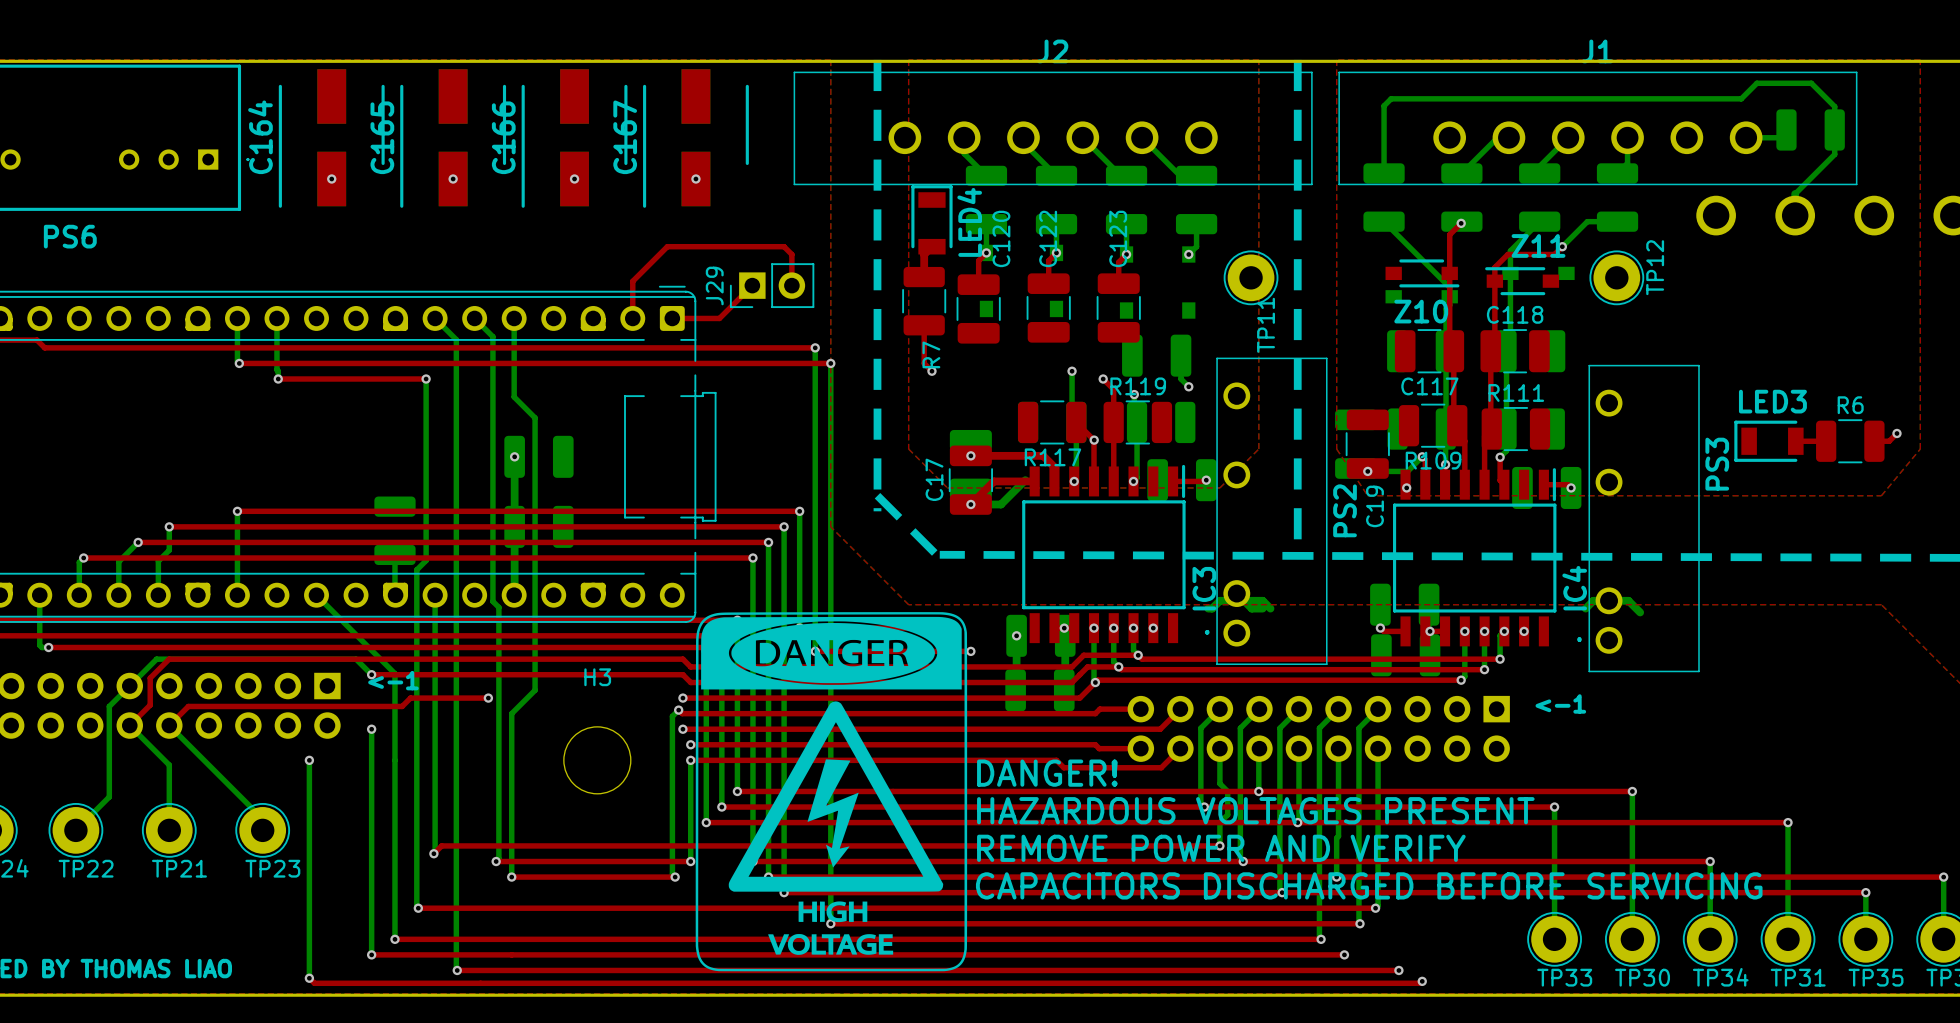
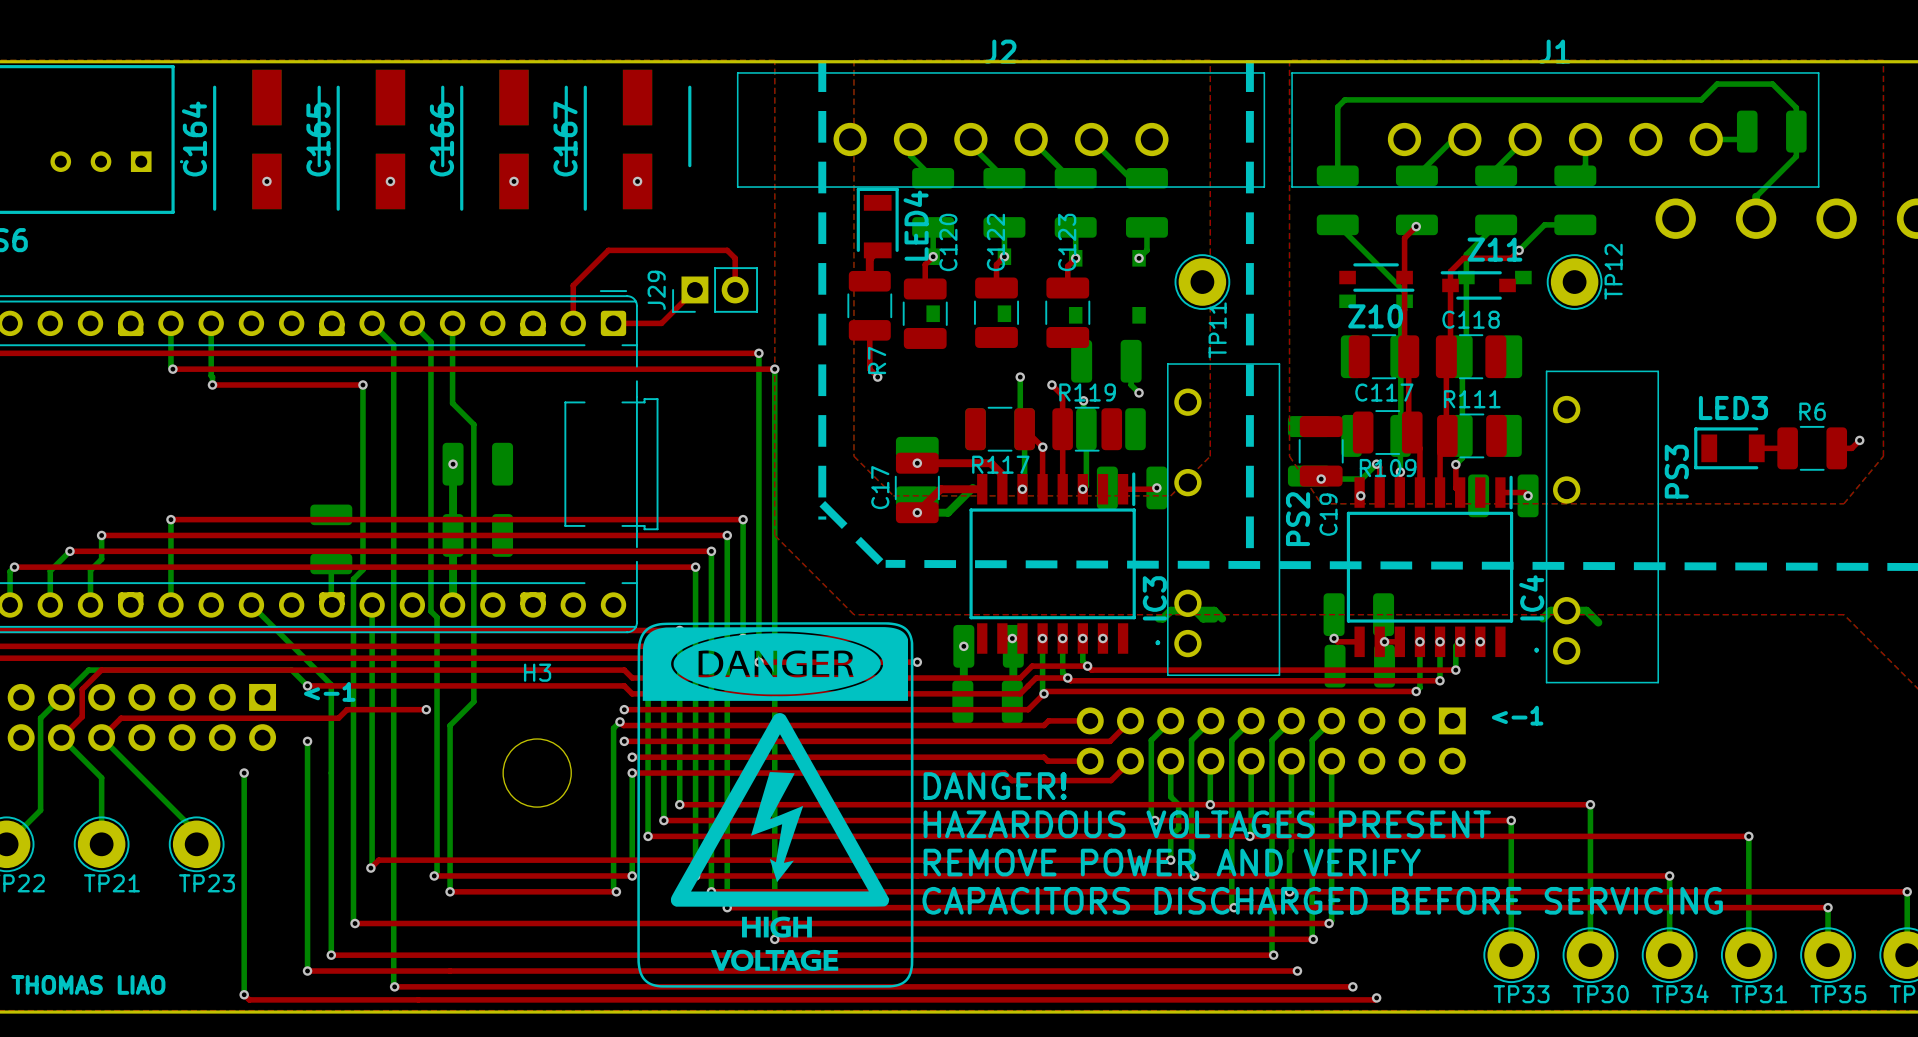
H3 name position: H3 (597, 677) -> H3 (537, 672)

